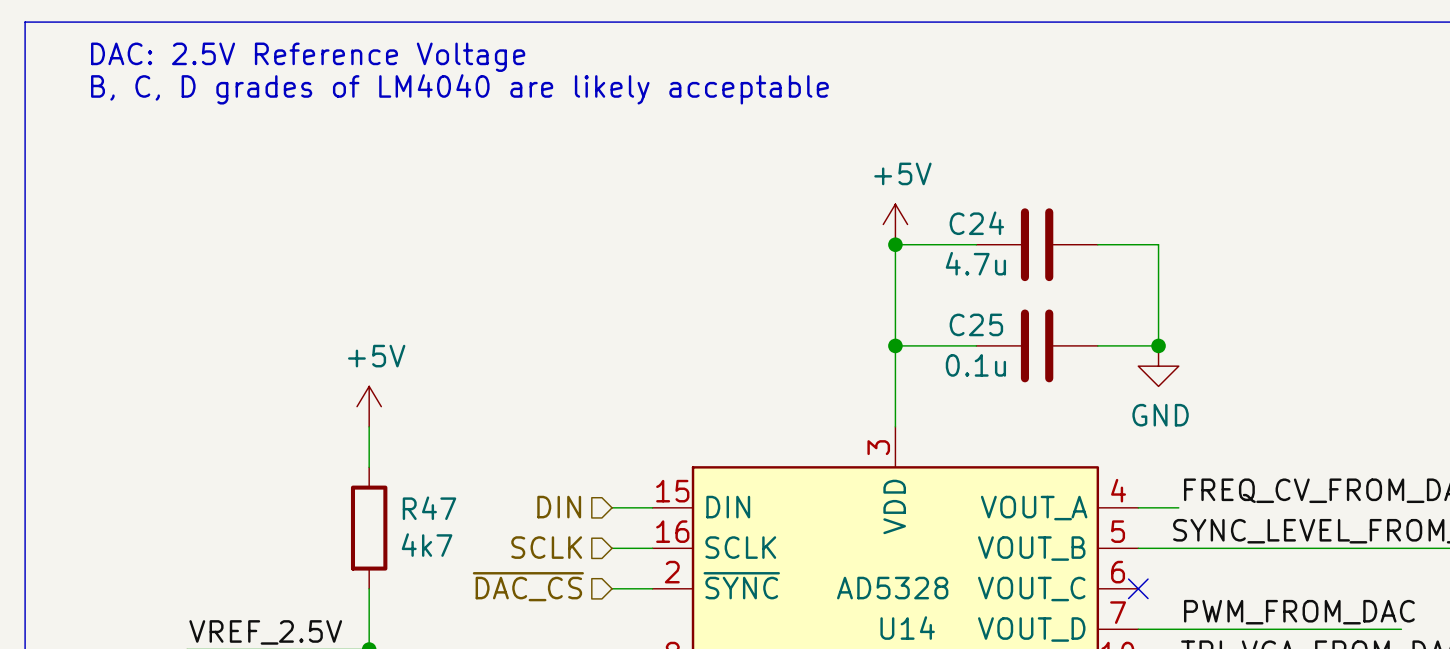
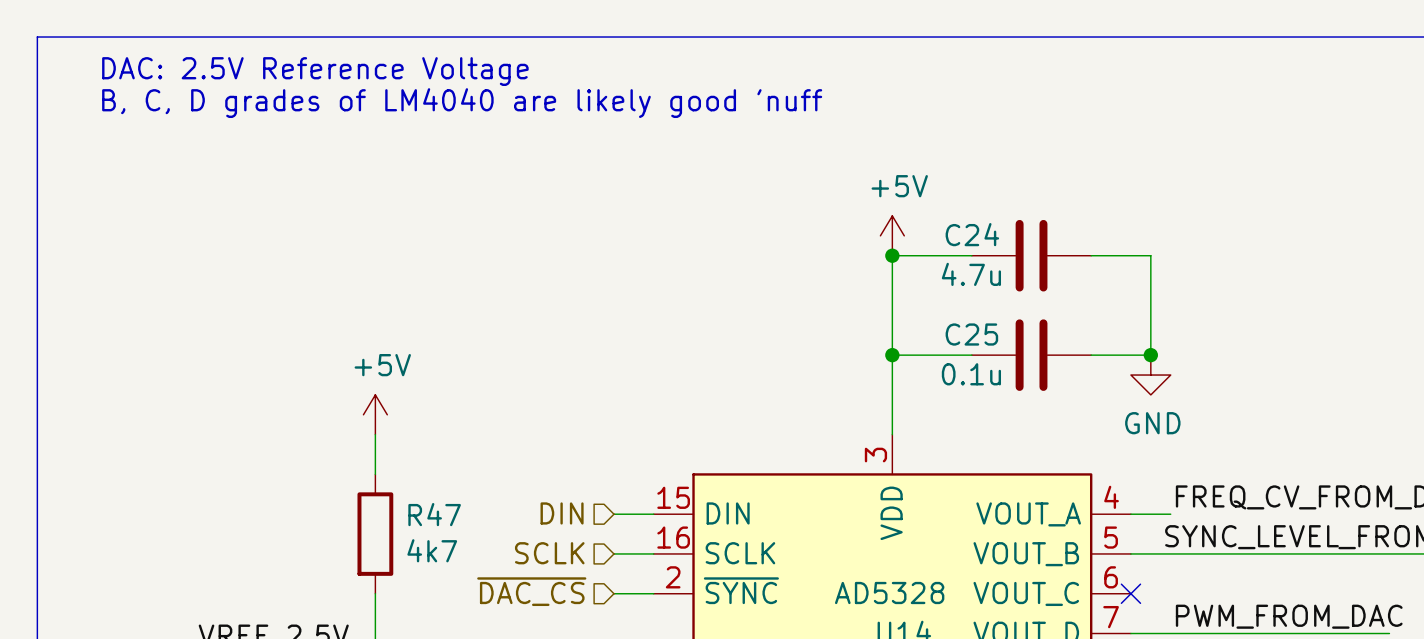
text: B, C, D grades of LM4040 are likely acceptable (459, 89) -> B, C, D grades of LM4040 are likely good 'nuff (462, 103)

